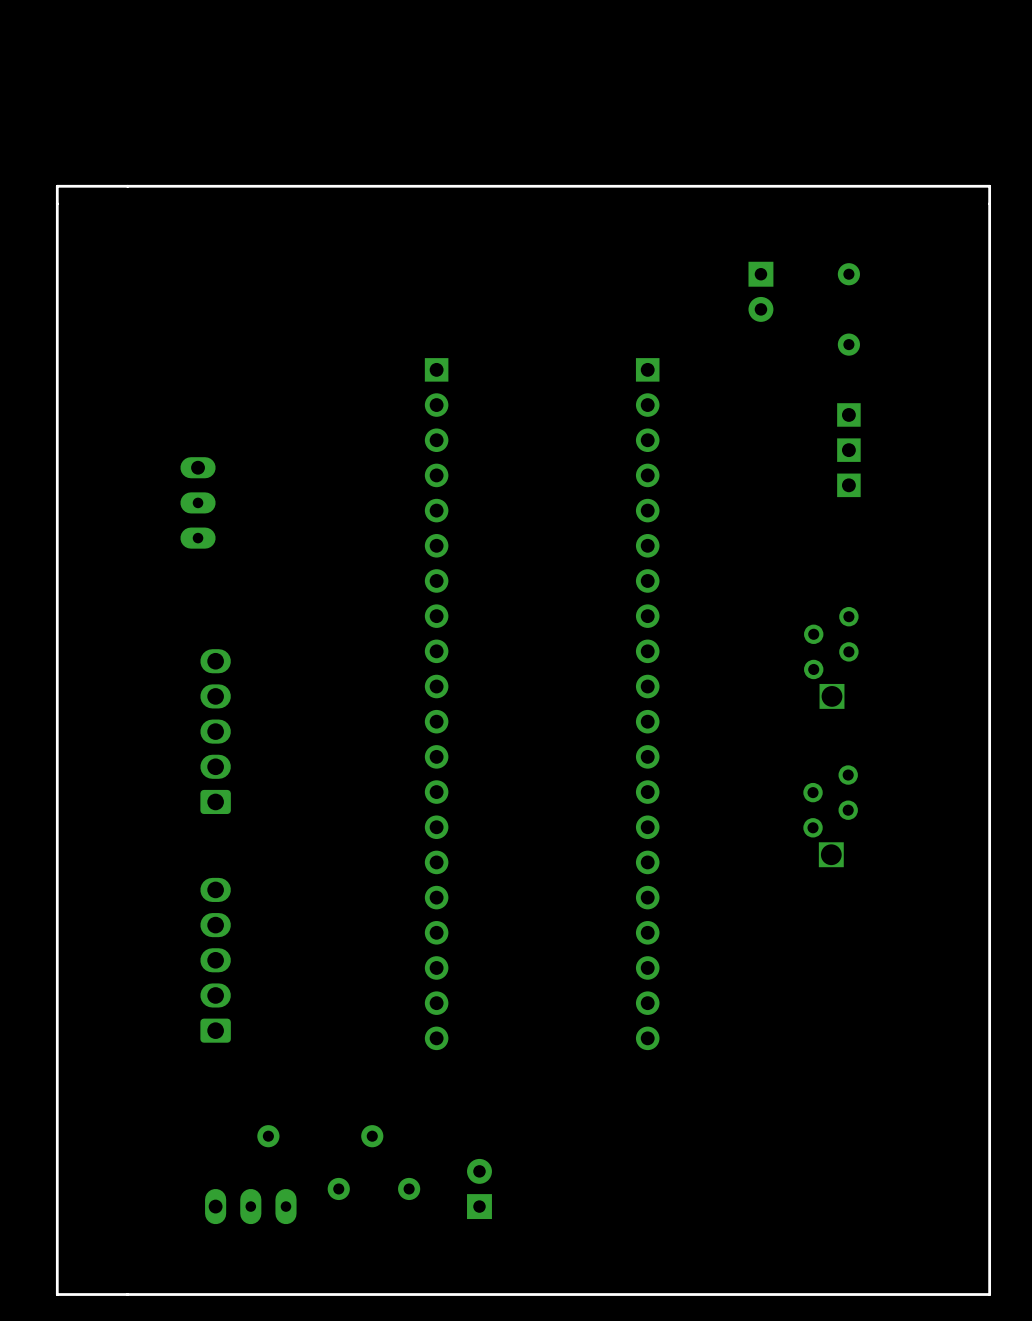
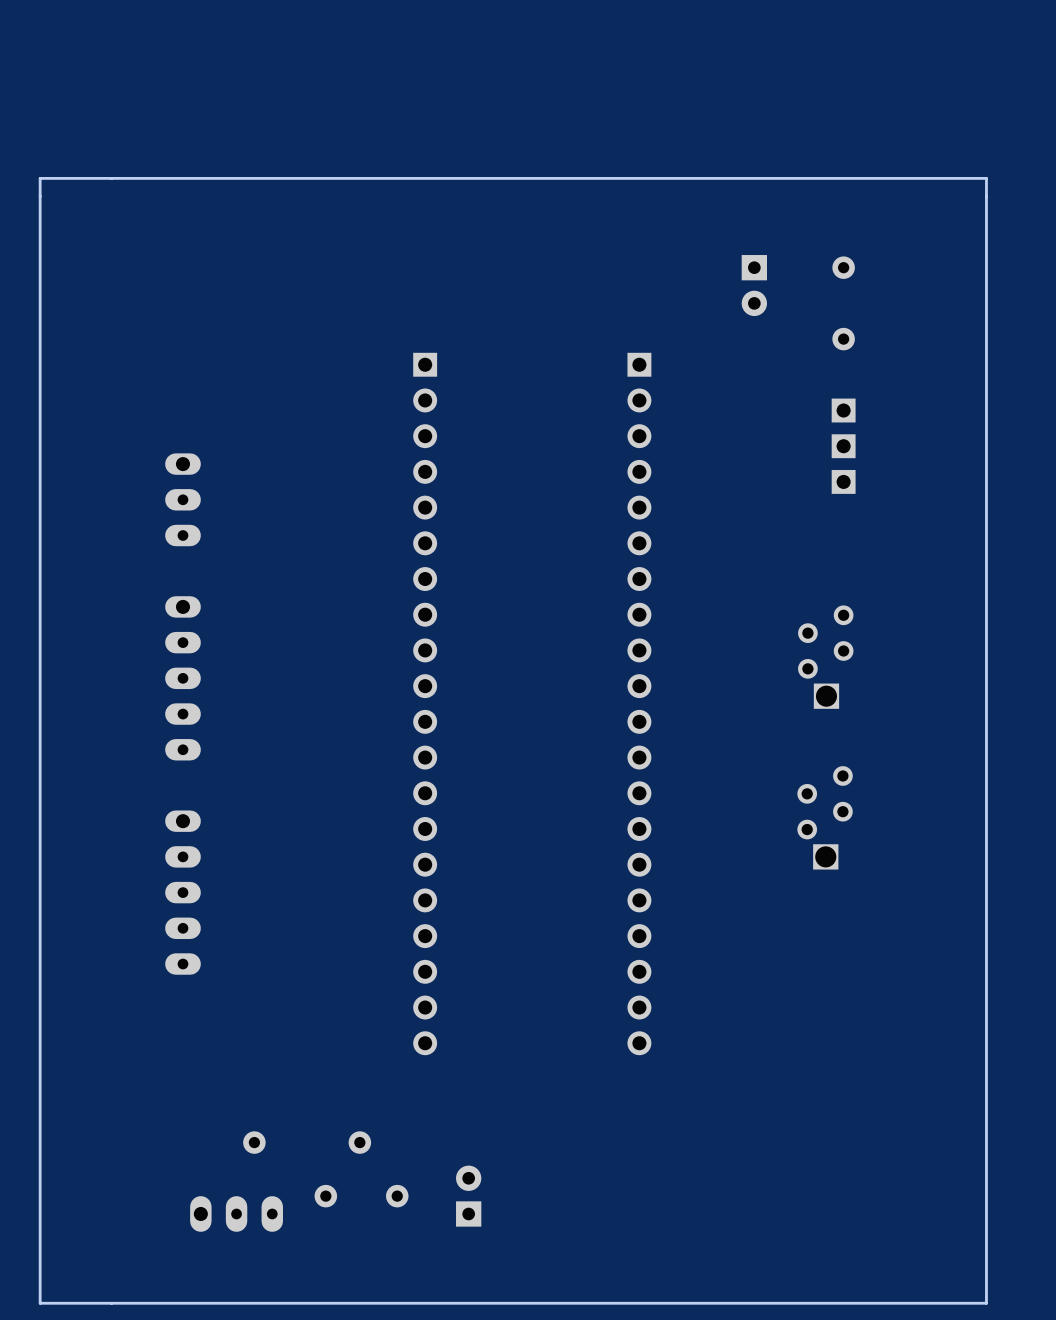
part: none -> (182, 678)
part: (215, 731) -> none
part: none -> (182, 892)
part: (215, 960) -> none

